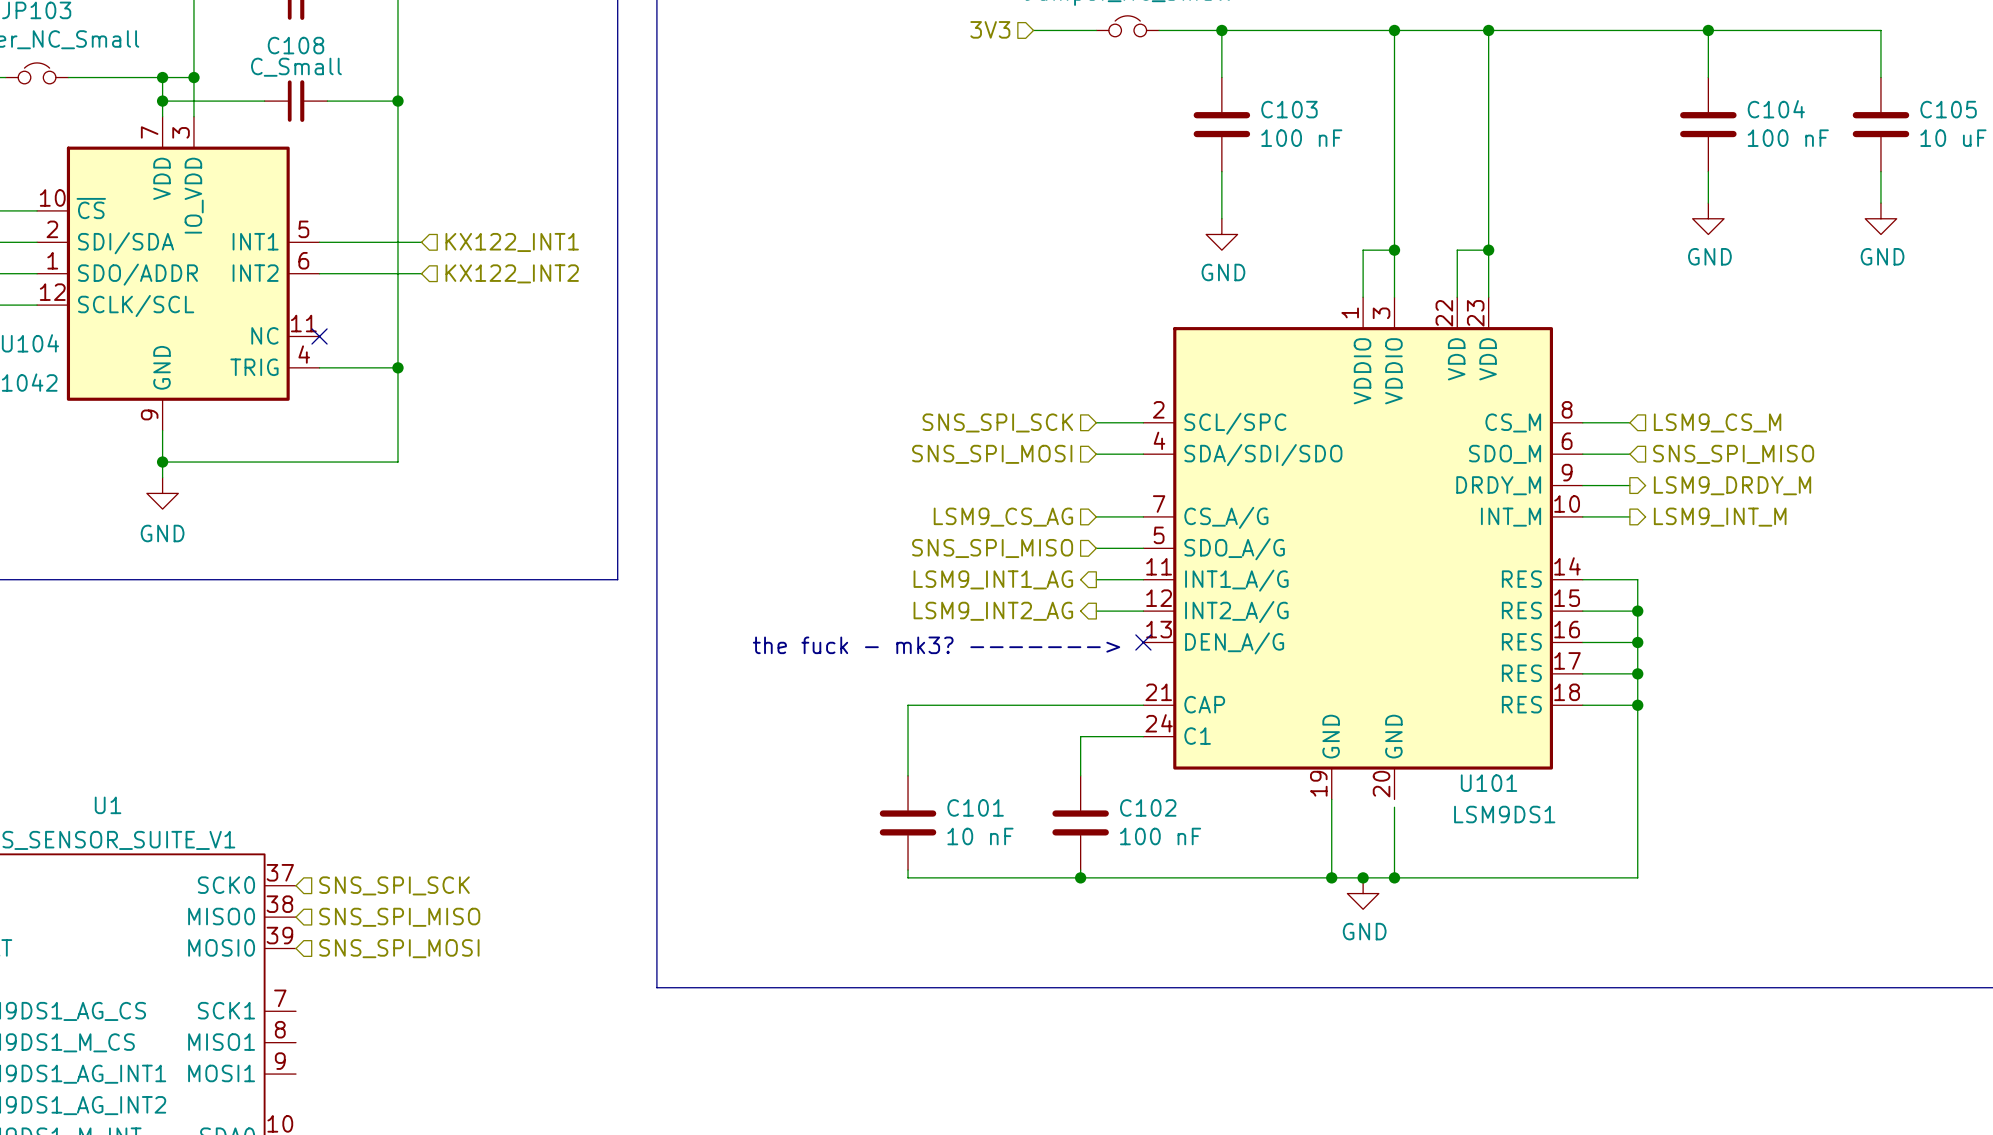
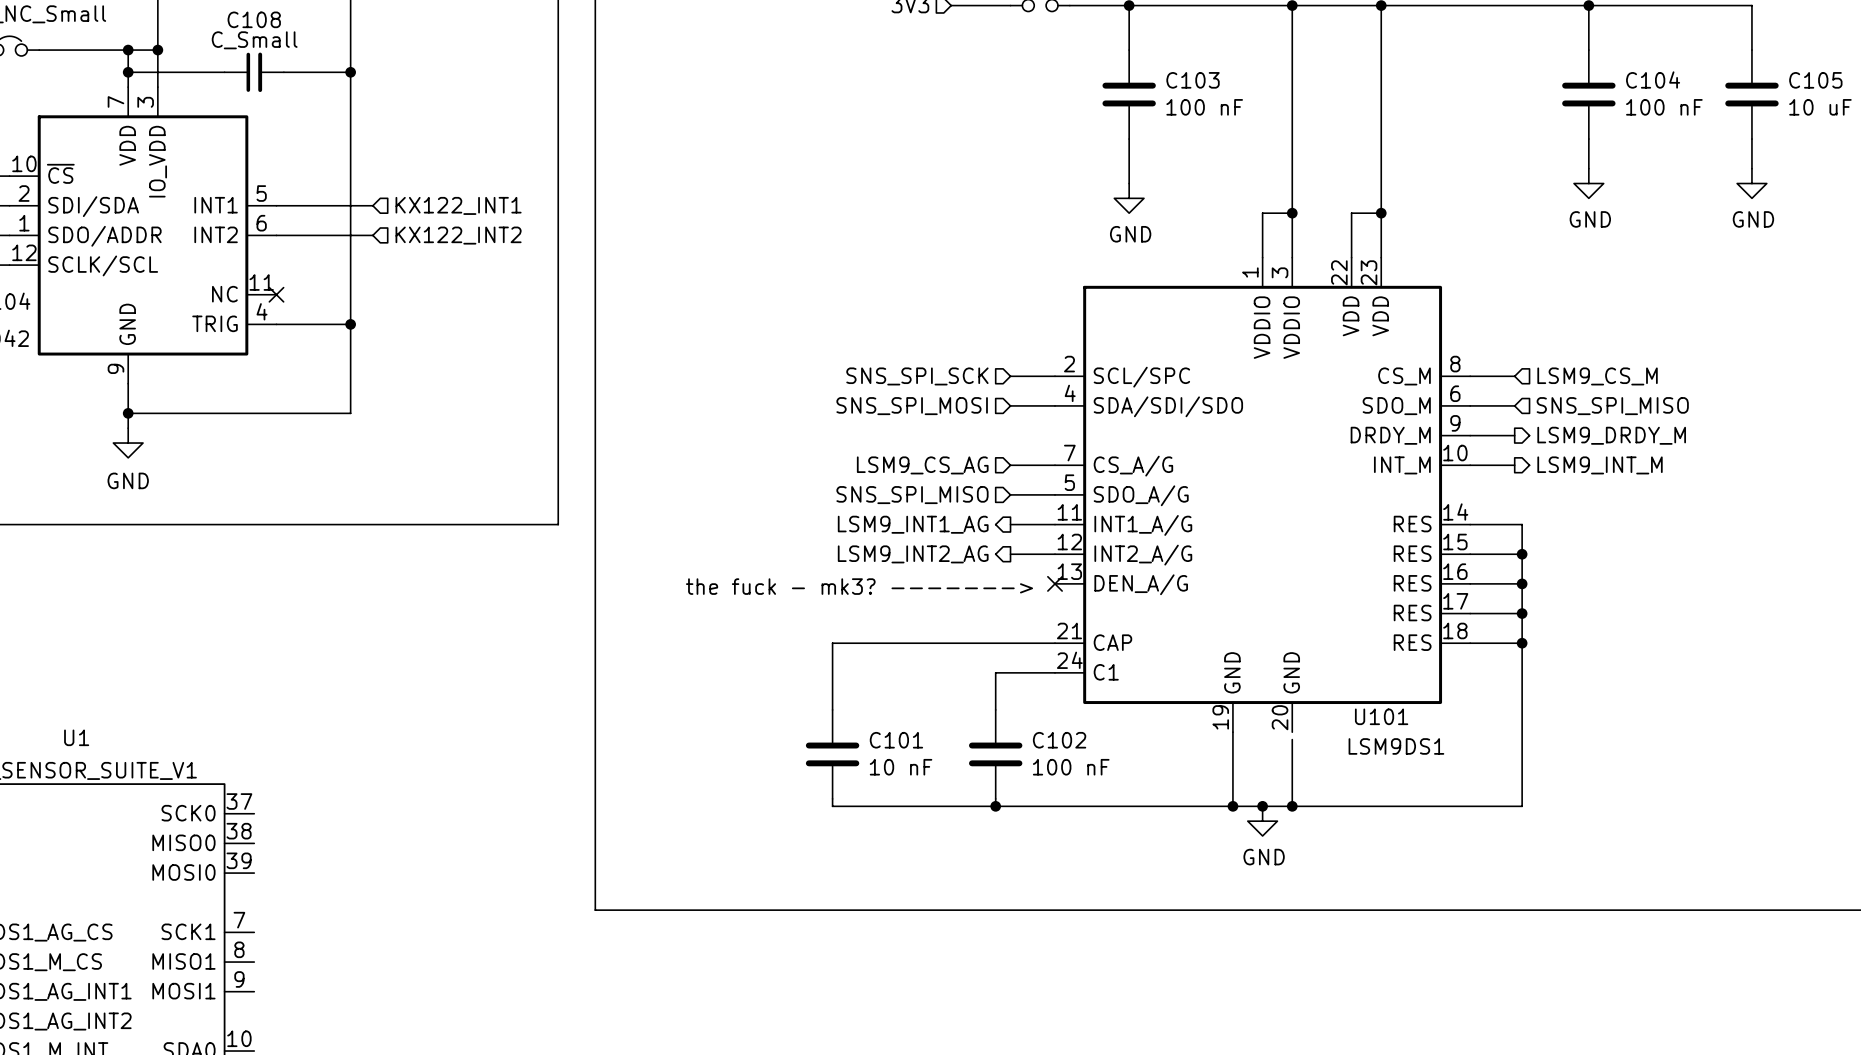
hierarchical label: SNS_SPI_SCK (394, 885) -> none
hierarchical label: SNS_SPI_MISO (399, 917) -> none
hierarchical label: SNS_SPI_MOSI (399, 948) -> none

